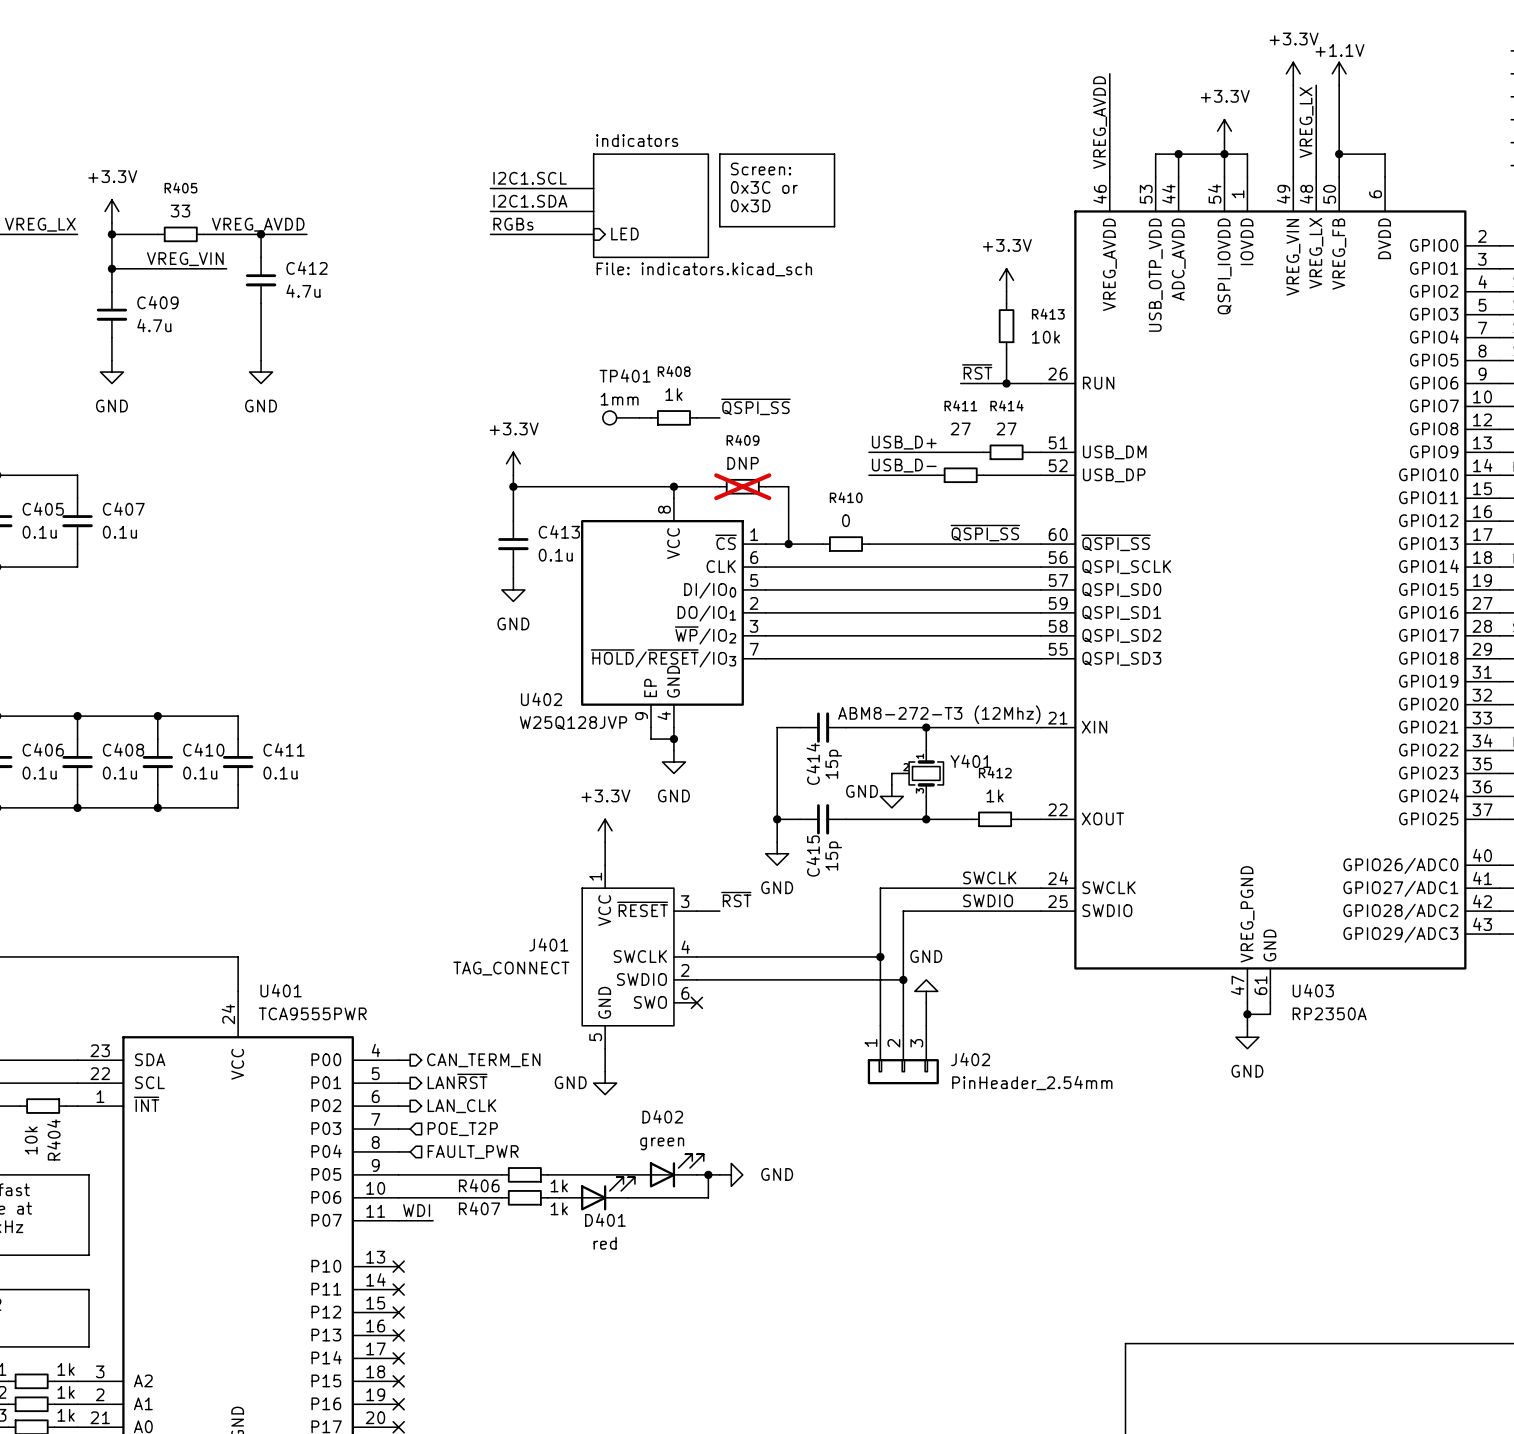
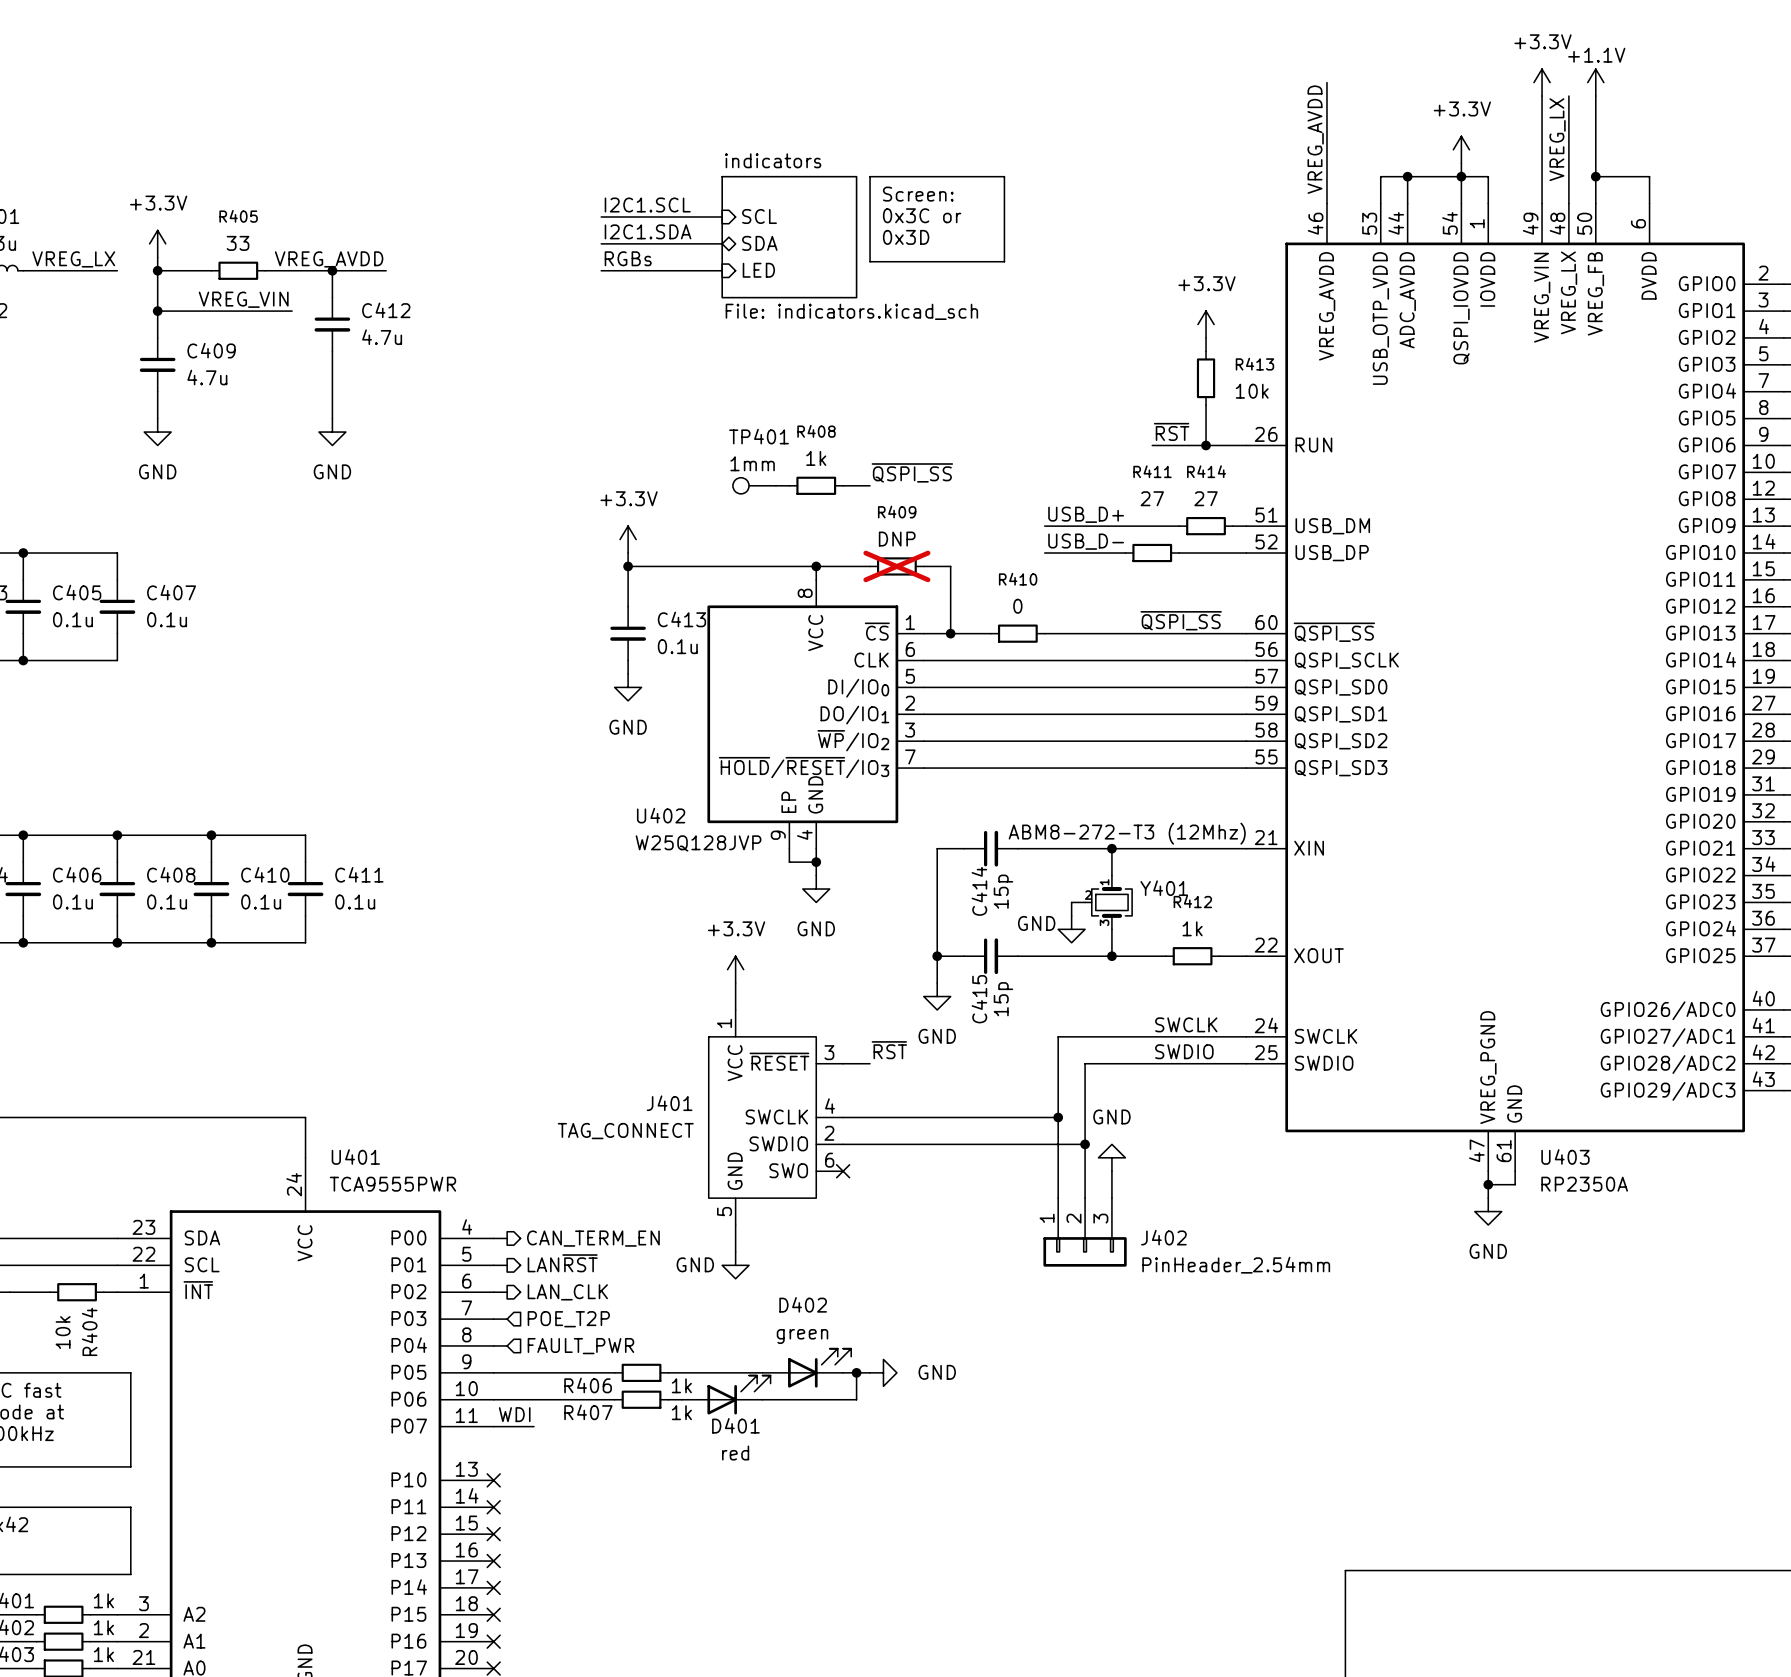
sheet pin: none -> SCL (759, 216)
sheet pin: none -> SDA (759, 243)

